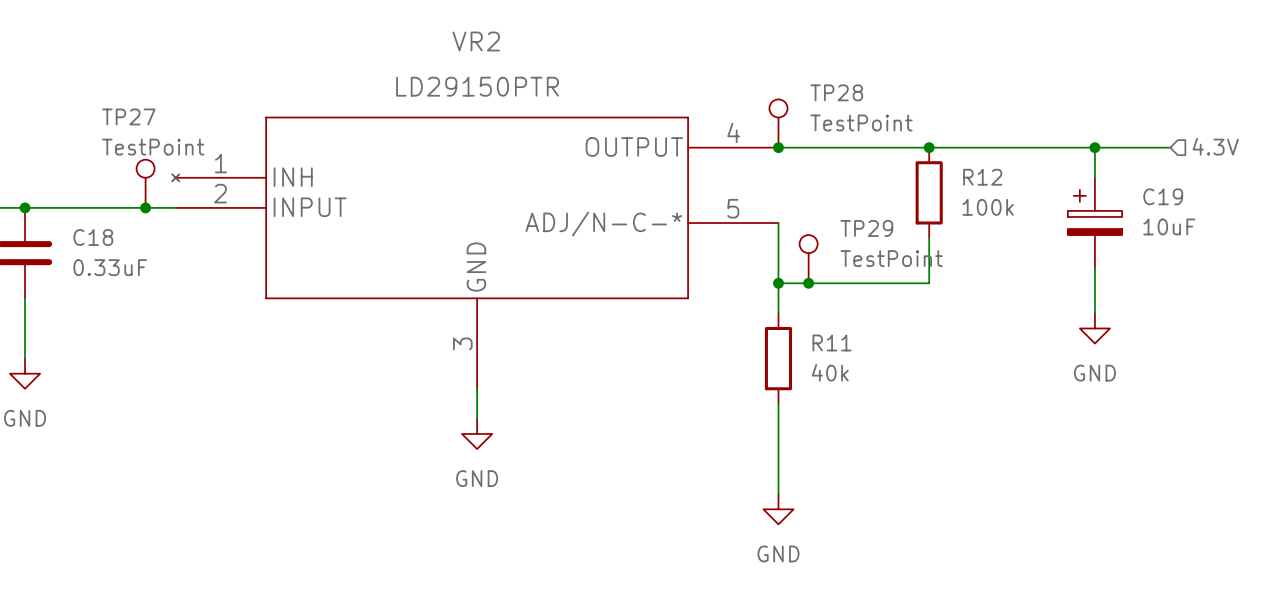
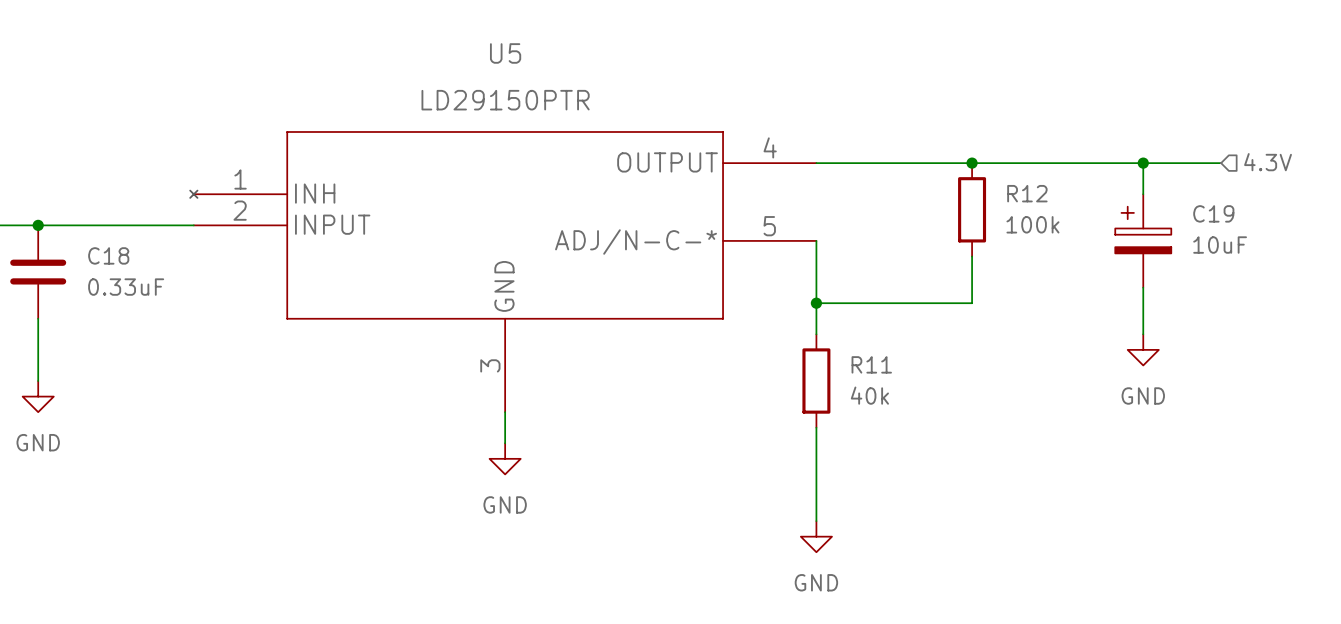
VR2 name: VR2 (476, 41) -> U5 (505, 53)
TP28: TestPoint (778, 123) -> none
junction: (778, 147) -> none
TP27: TestPoint (145, 183) -> none
junction: (145, 207) -> none
TP29: TestPoint (808, 259) -> none
junction: (808, 283) -> none

